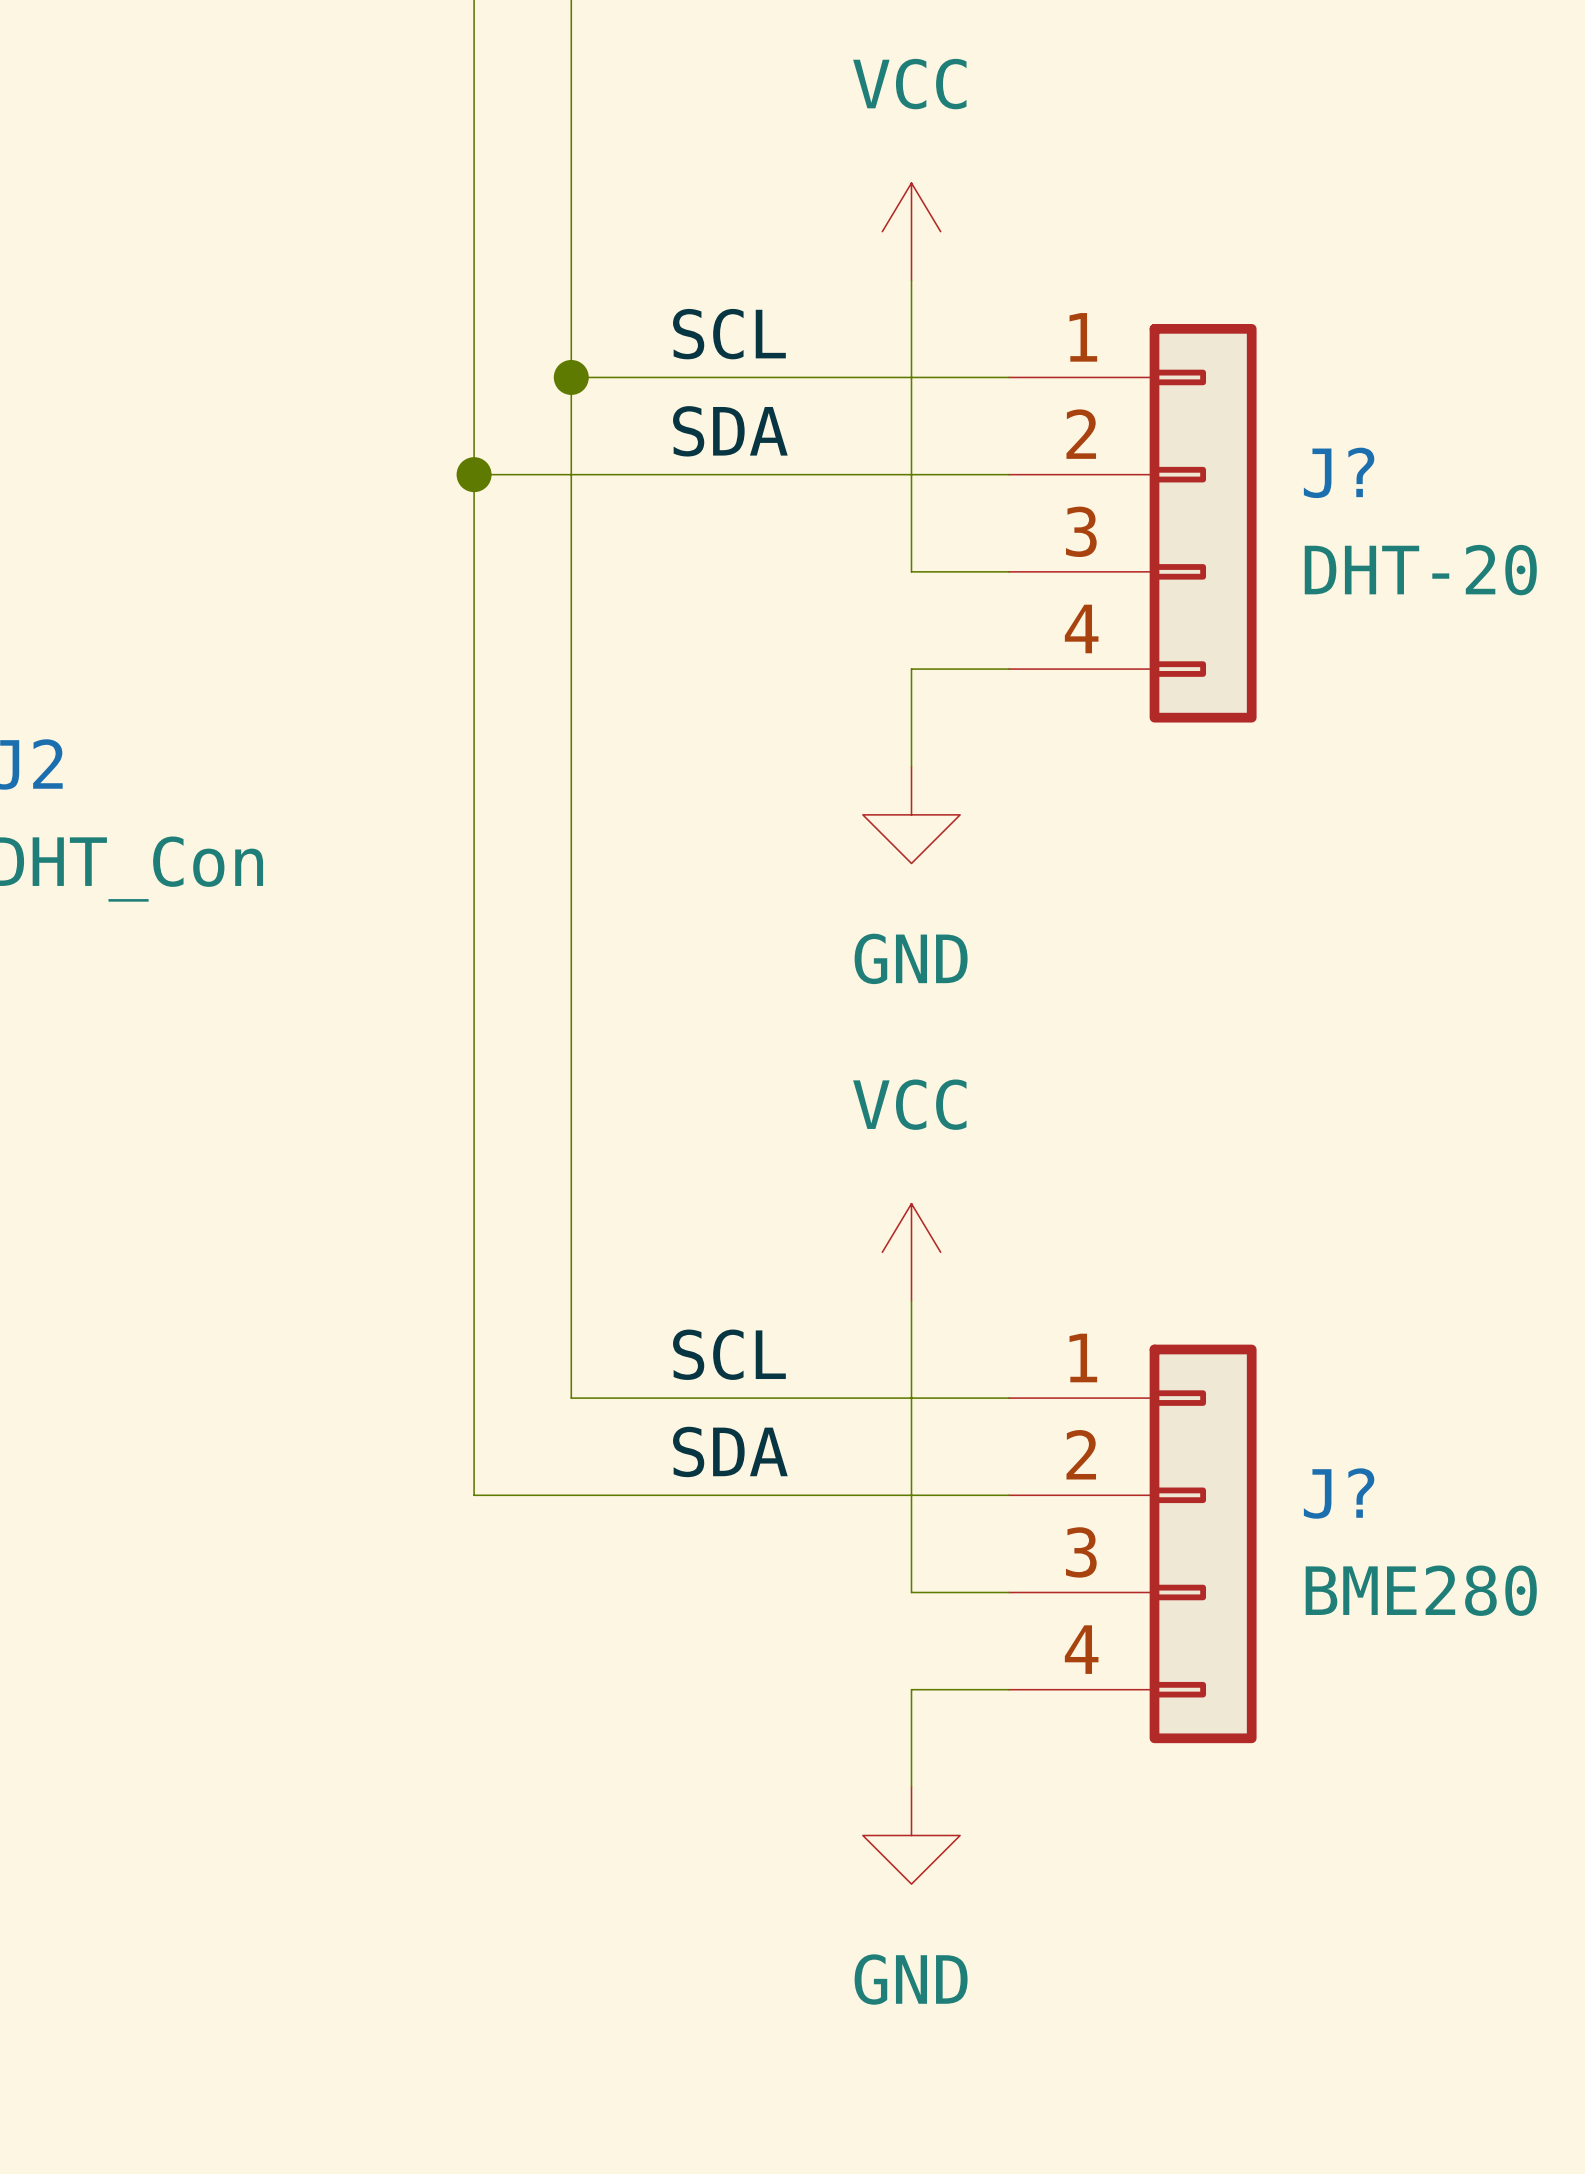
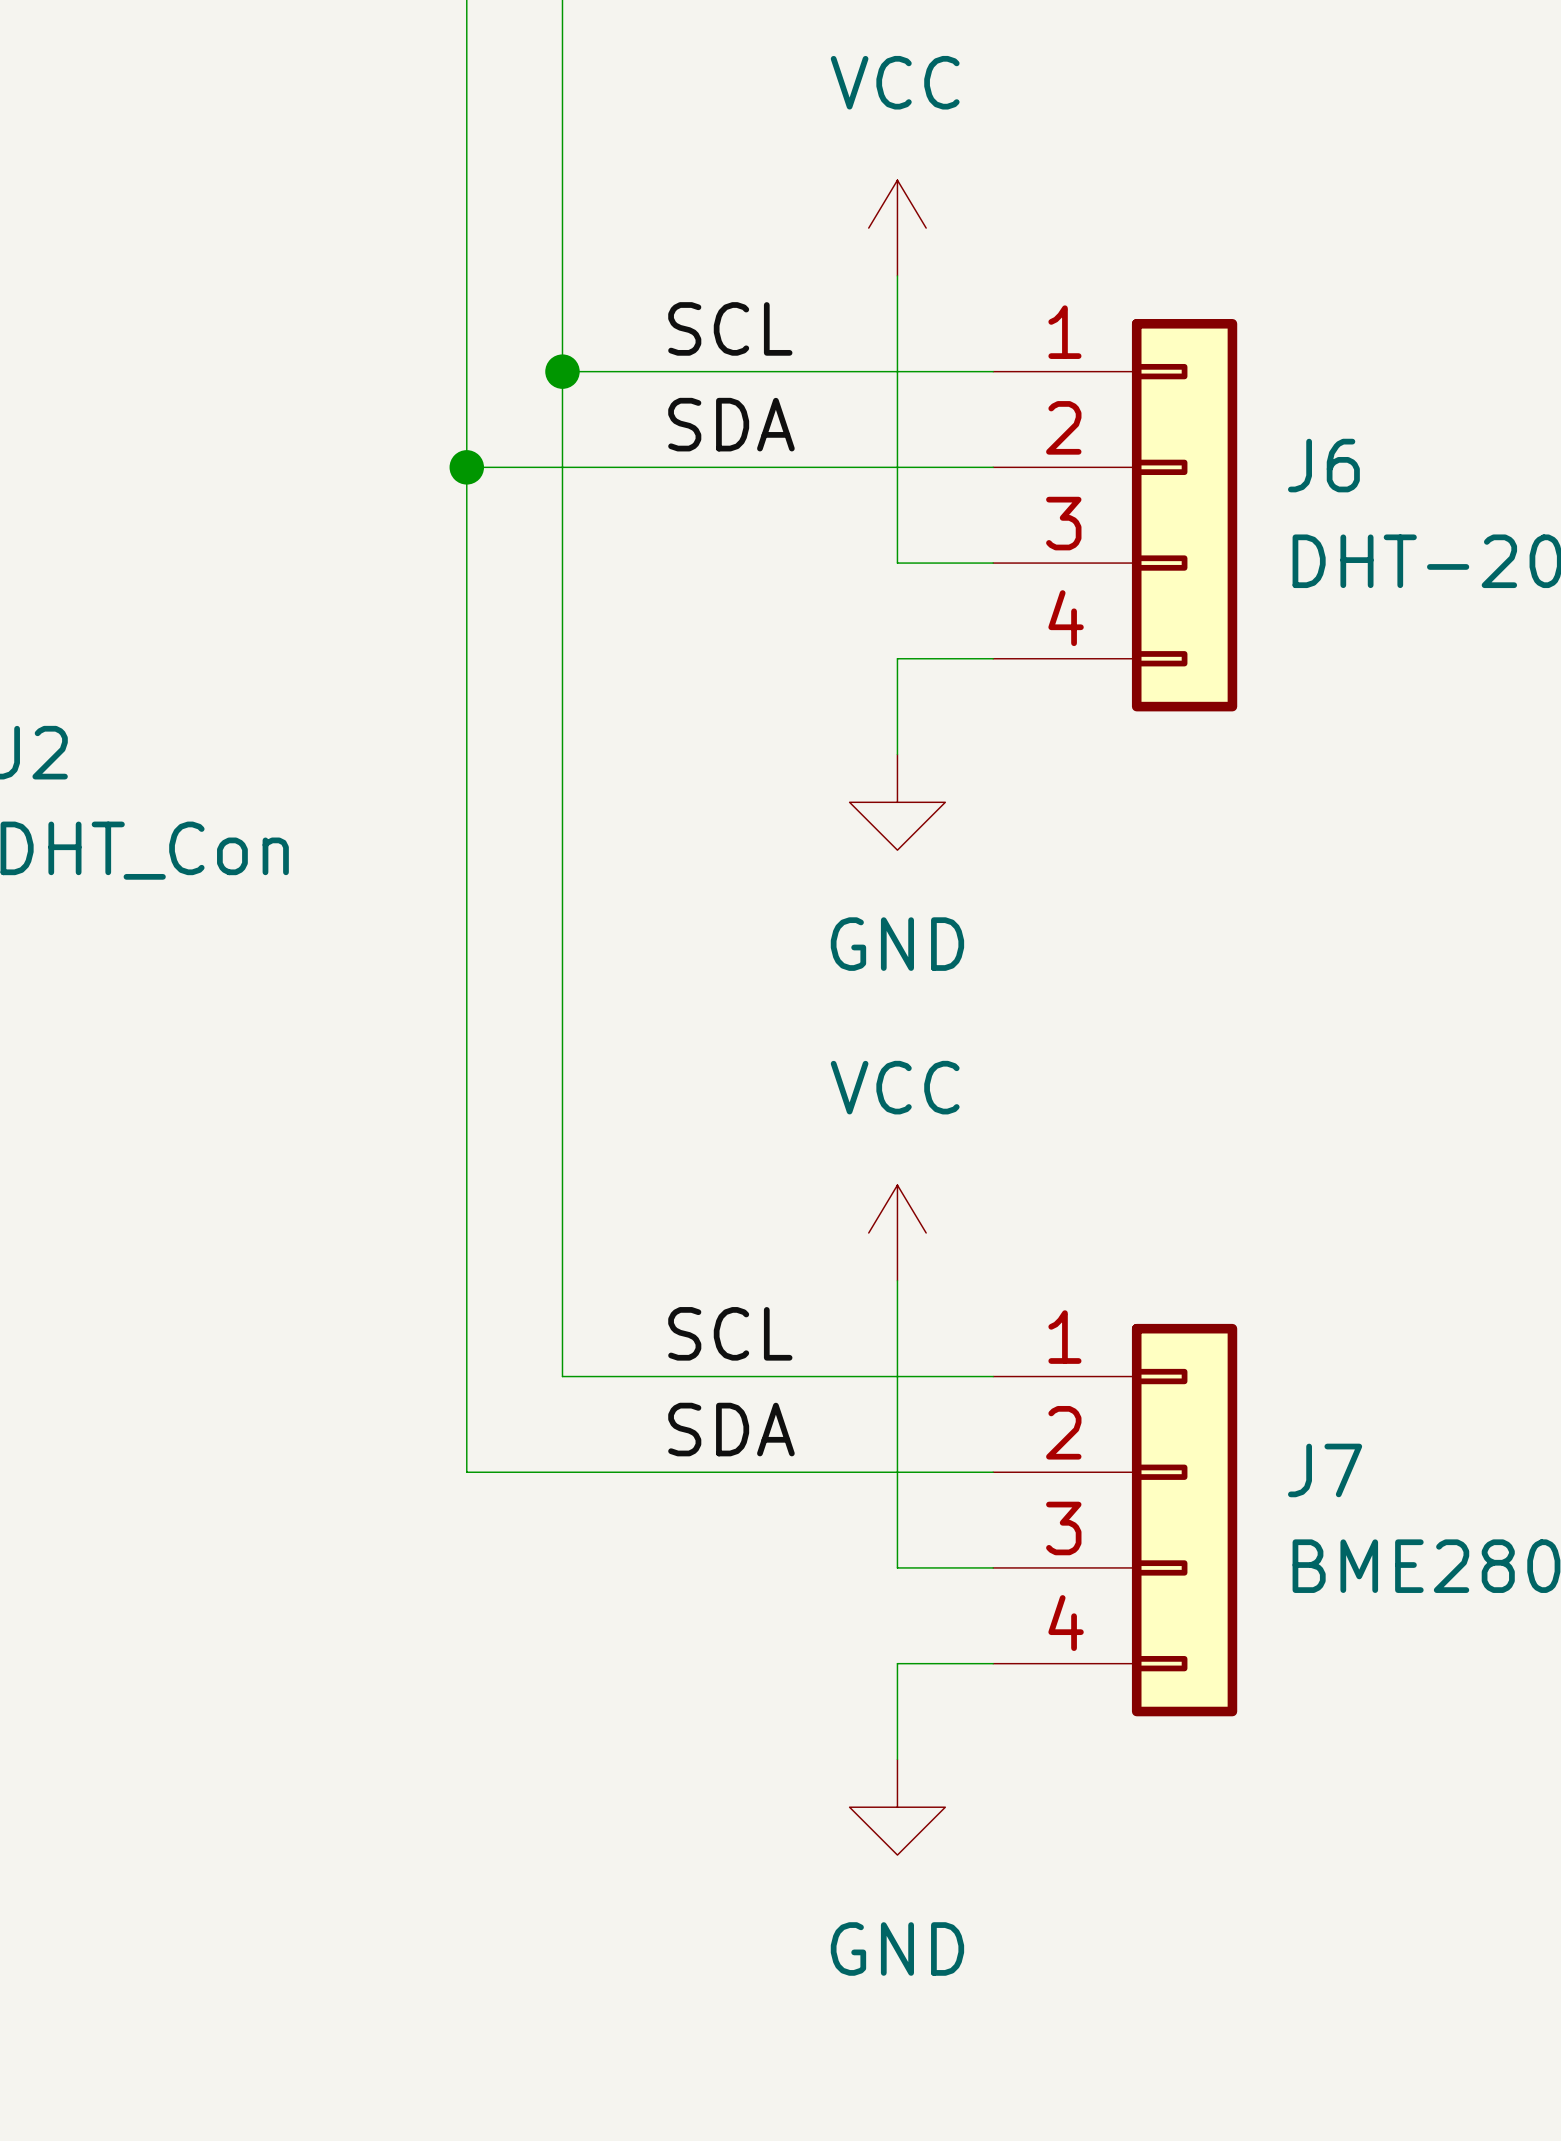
J? name: J? (1339, 472) -> J6 (1323, 465)
J? name: J? (1339, 1493) -> J7 (1325, 1470)

